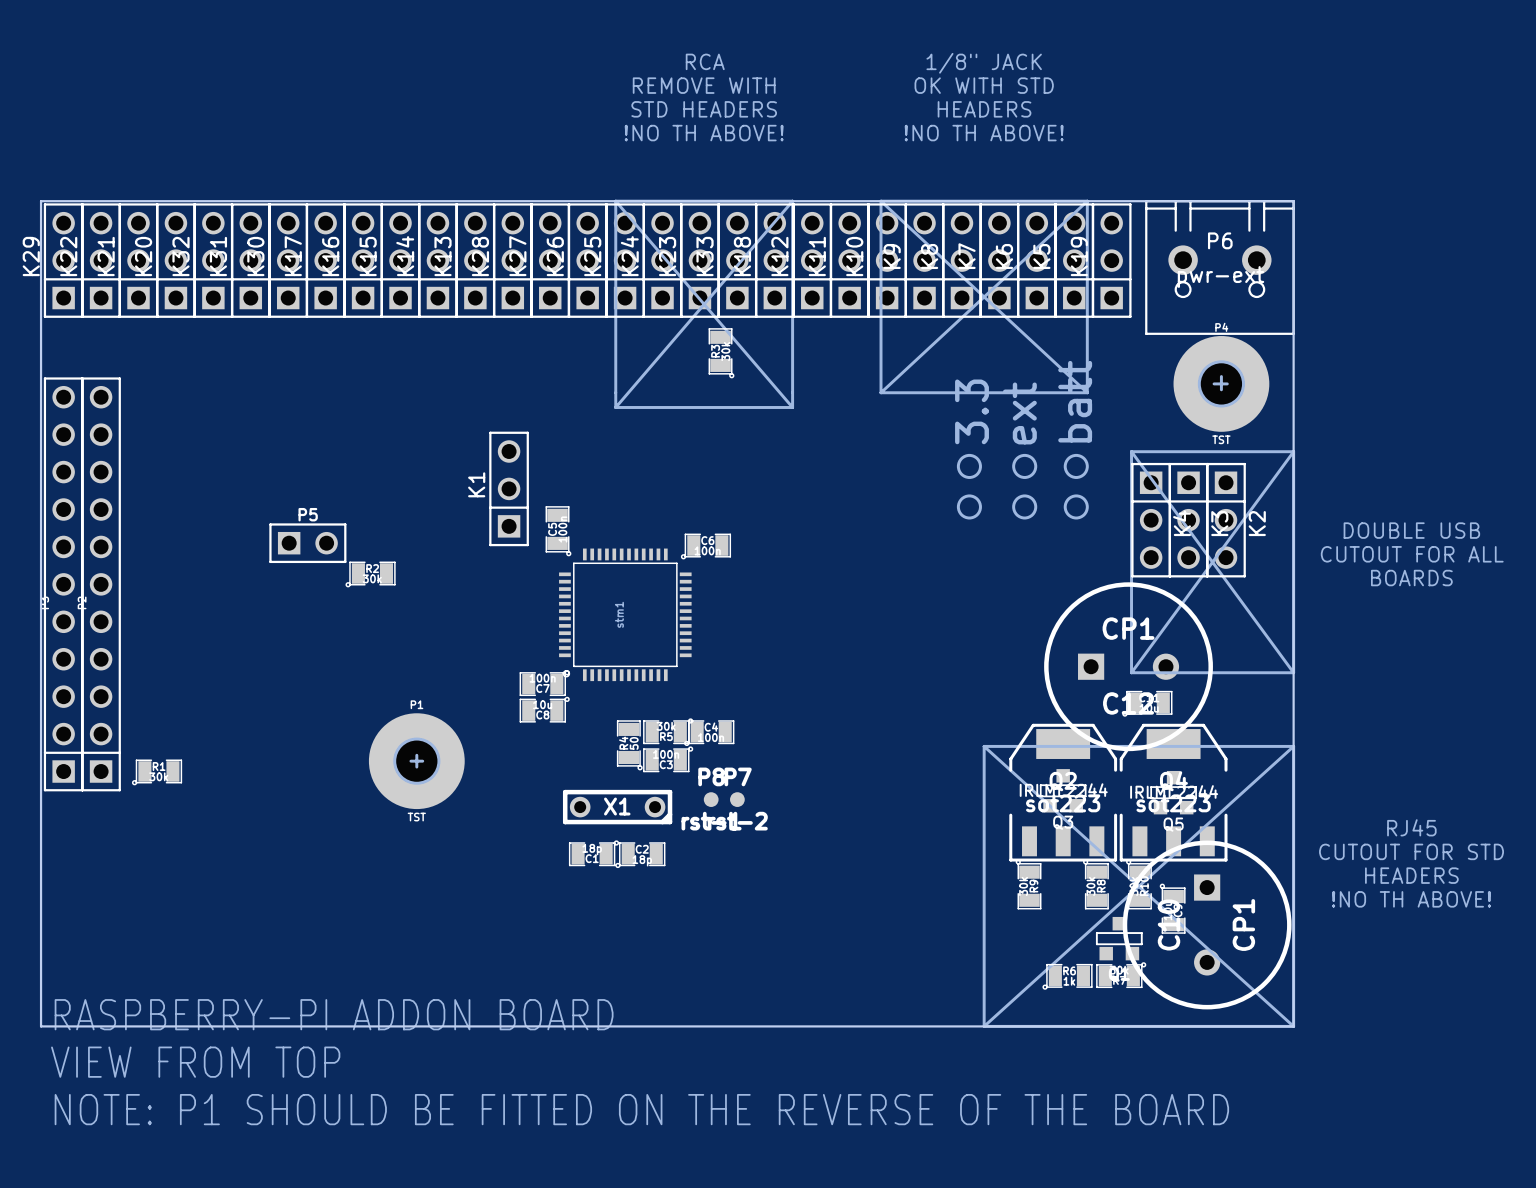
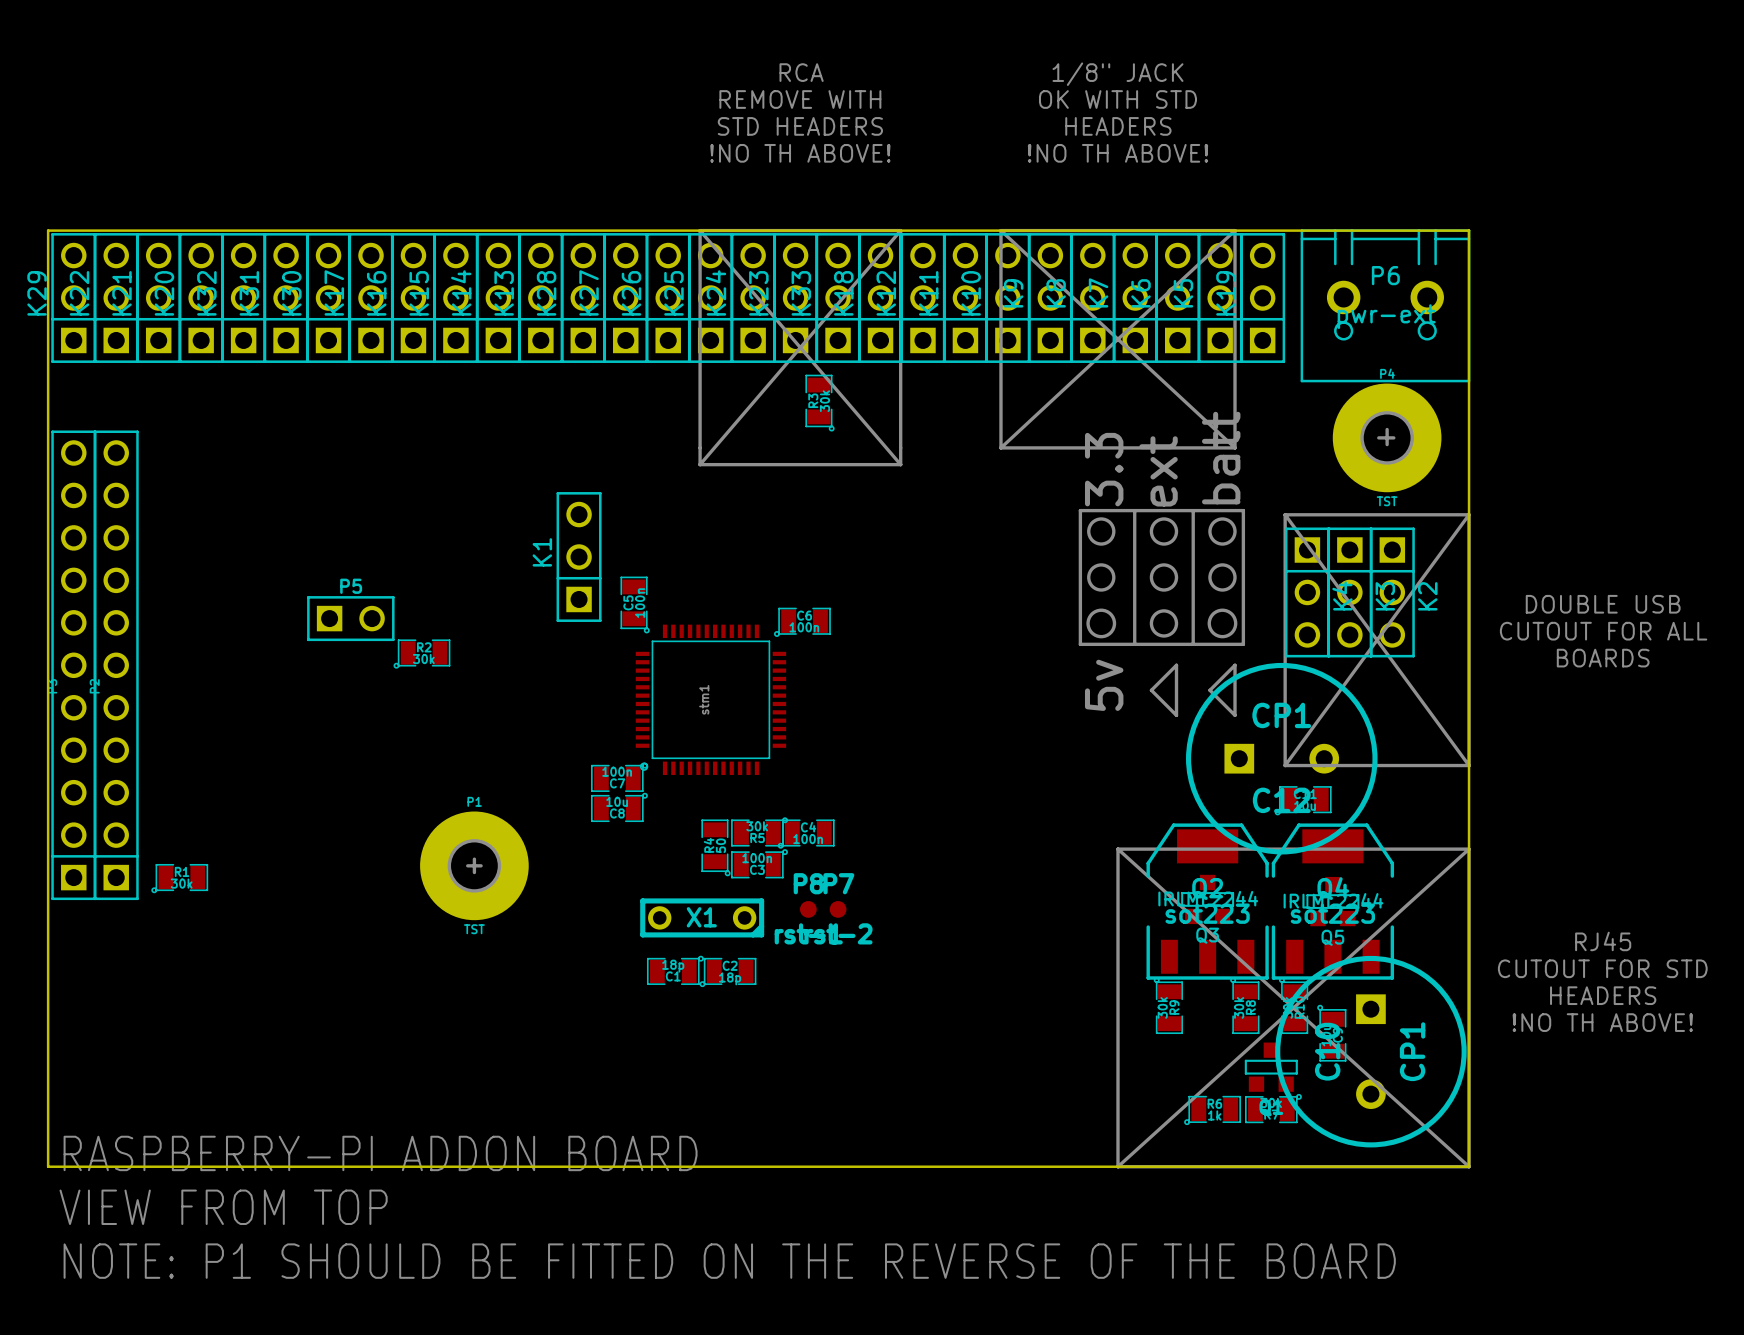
line: none -> (1080, 510) (1080, 644) (1243, 644) (1243, 510) (1080, 510)
line: none -> (1134, 510) (1134, 644)
line: none -> (1193, 510) (1193, 644)
drawing: none -> [1086, 608, 1117, 639]
drawing: none -> [1149, 609, 1179, 638]
drawing: none -> [1207, 608, 1238, 639]
line: none -> (1176, 665) (1176, 715) (1151, 690) (1176, 665)
line: none -> (1235, 665) (1235, 715) (1209, 690) (1235, 665)
text: none -> 5v (1104, 685)

